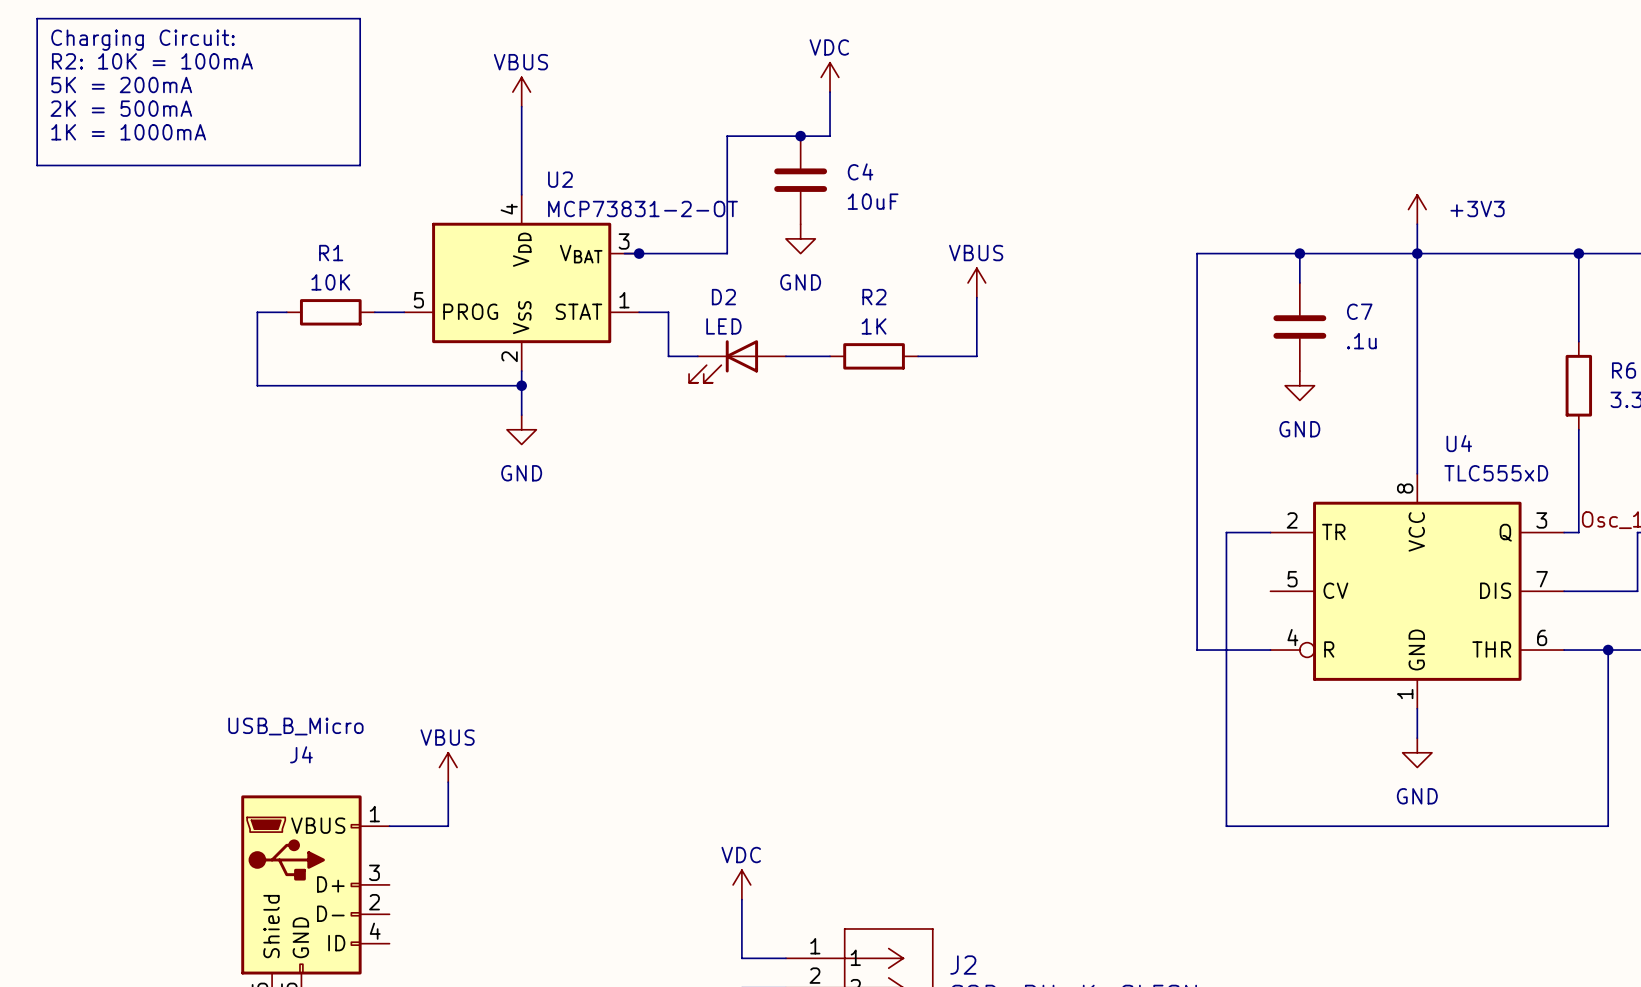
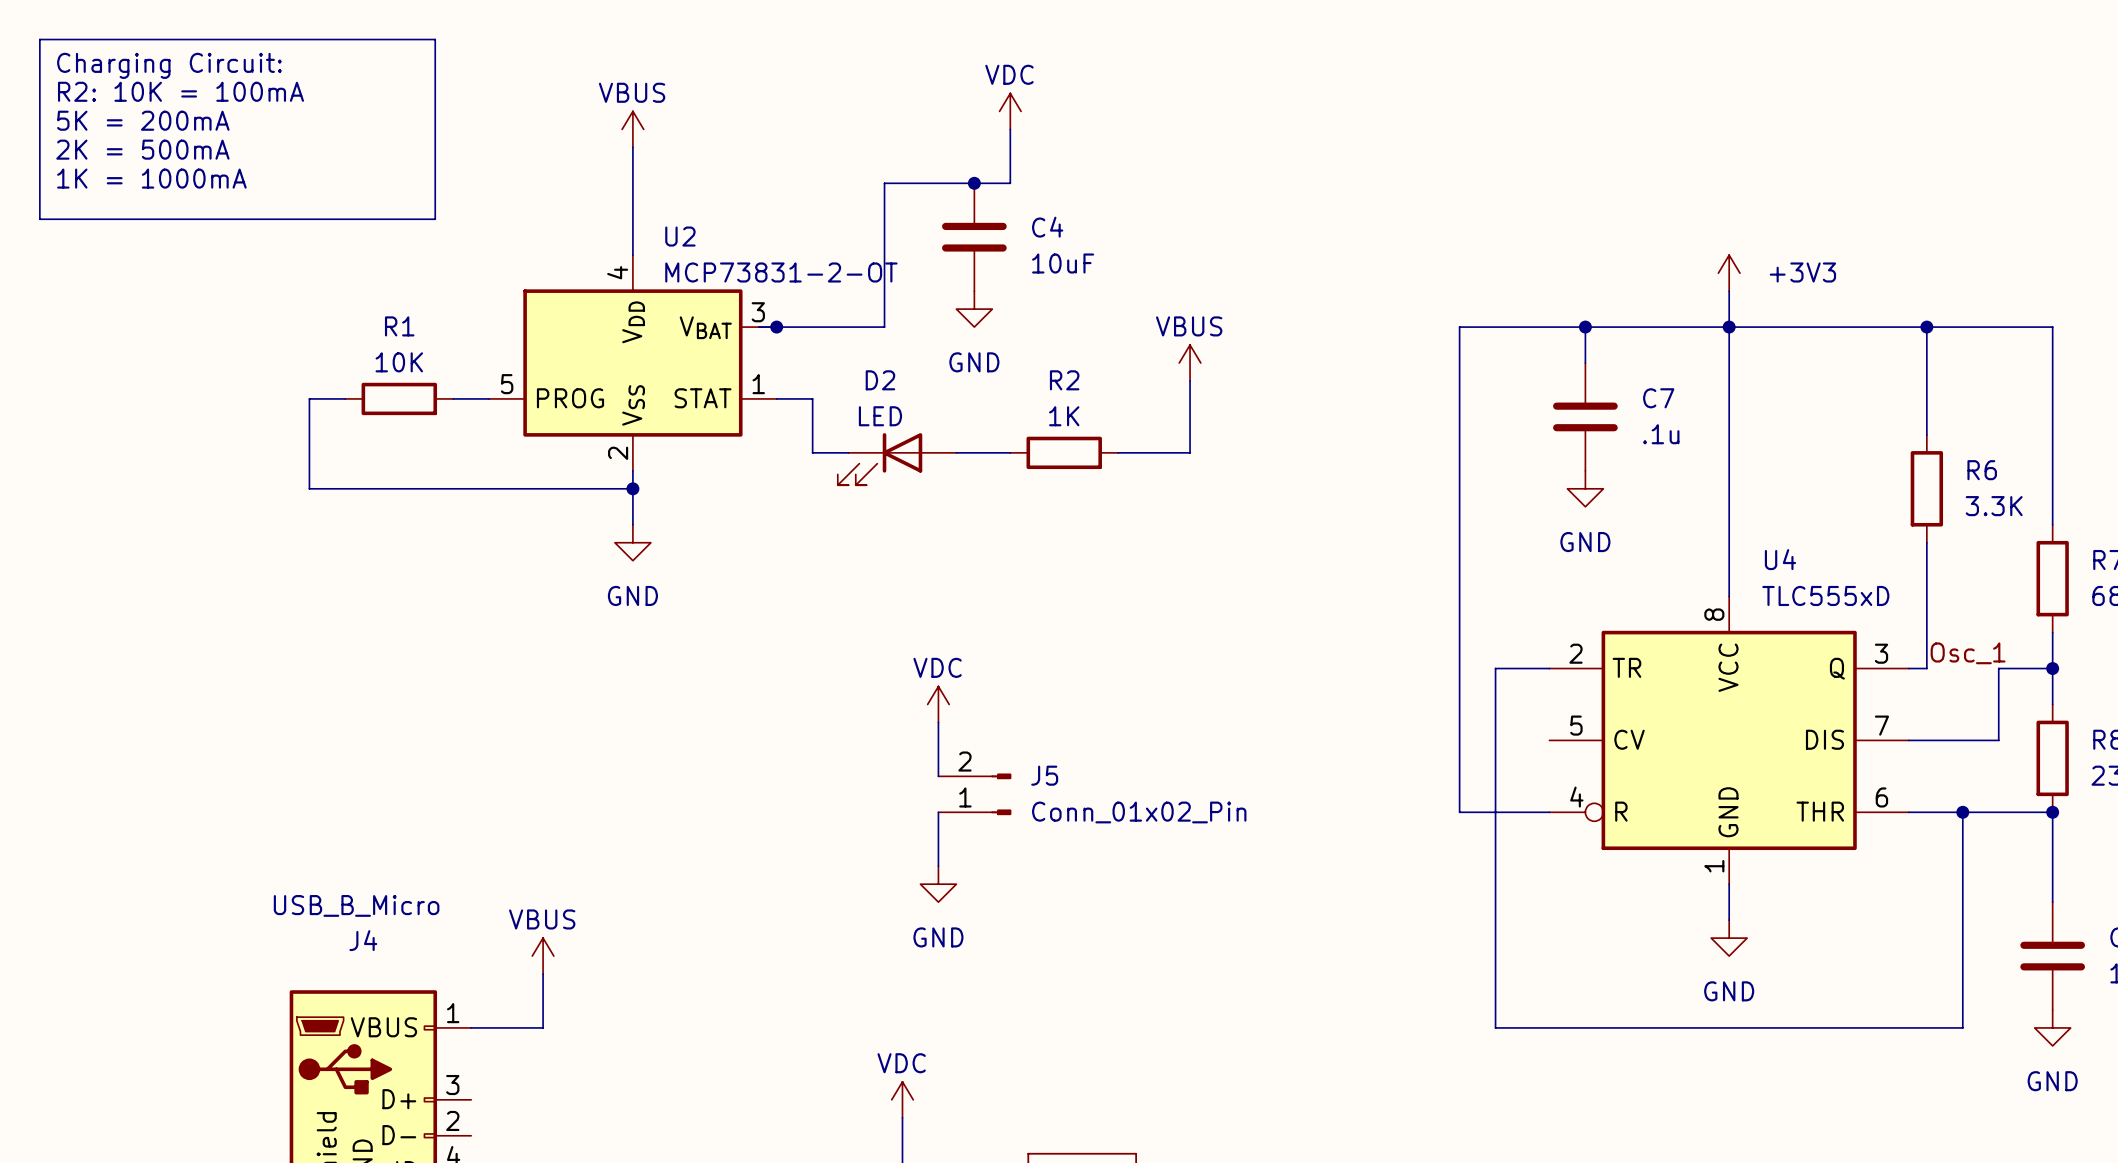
power symbol: none -> VDC (938, 704)
wire: none -> (938, 722) (938, 776)
J5: none -> Conn_01x02_Pin (974, 794)
wire: none -> (938, 812) (938, 866)
power symbol: none -> GND (938, 884)

